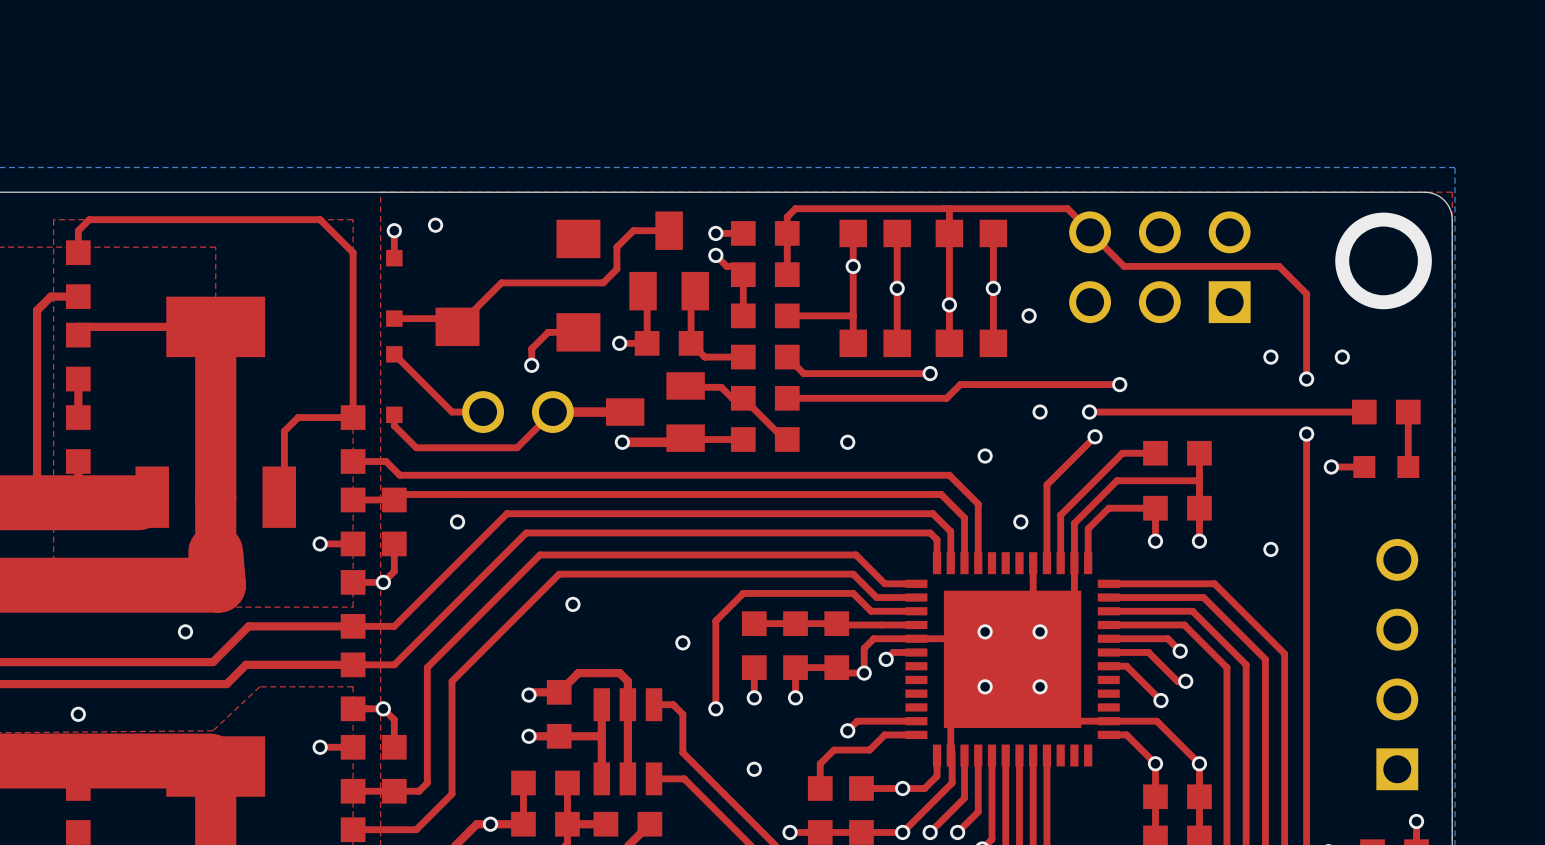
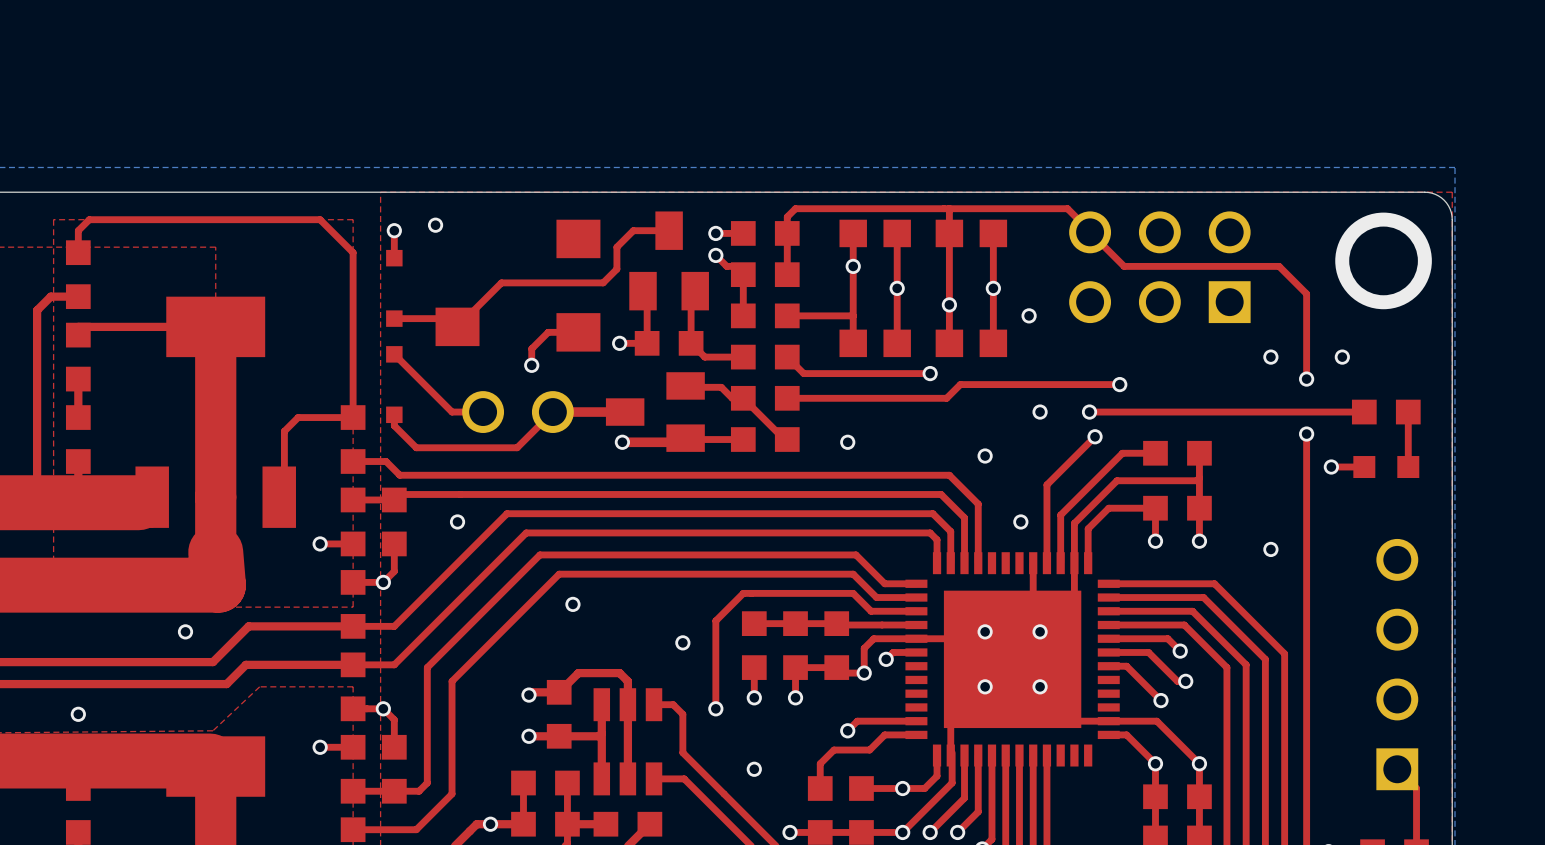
top track: none -> (1397, 769) (1416, 788) (1416, 821)
via: (1416, 821) -> none

